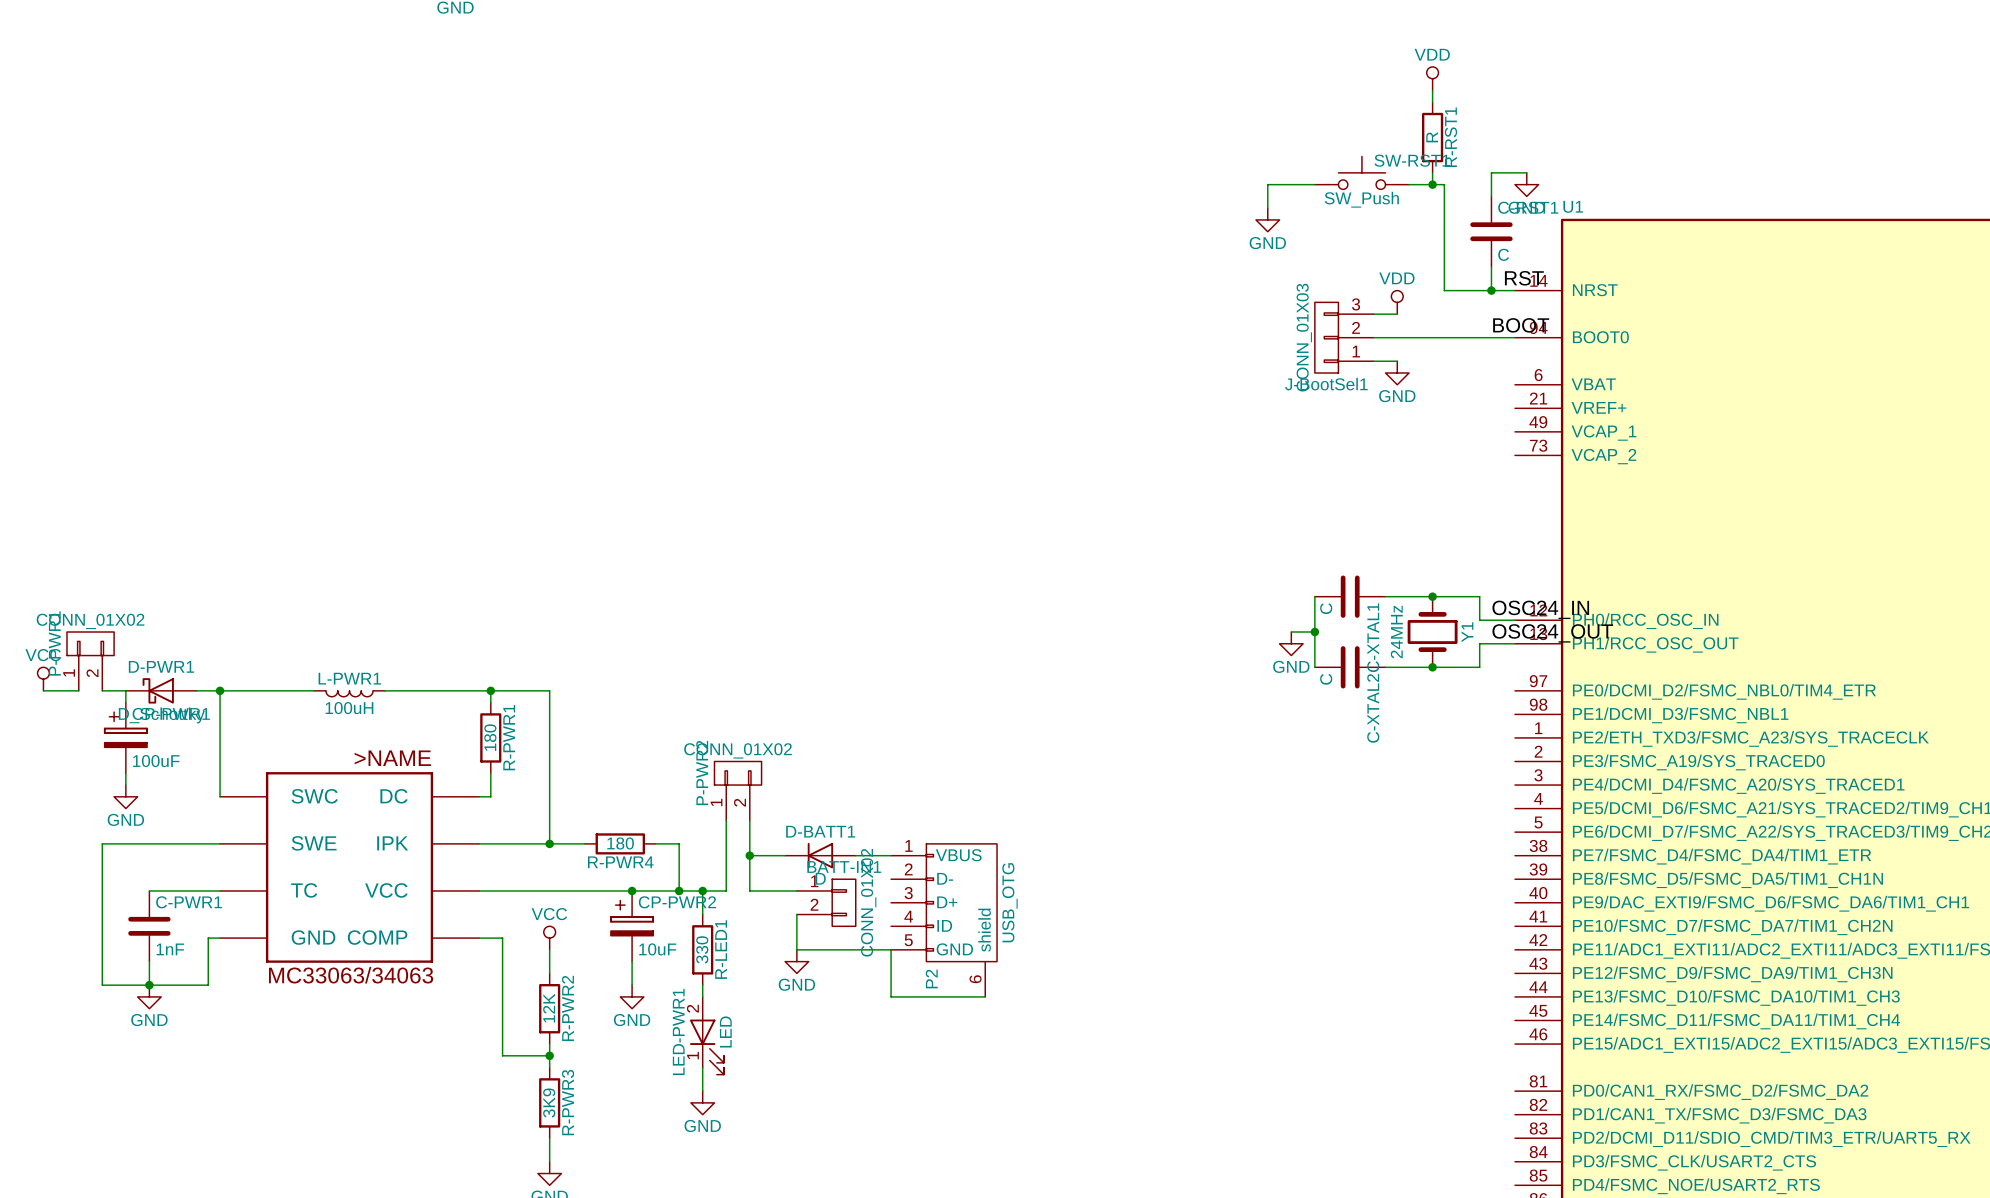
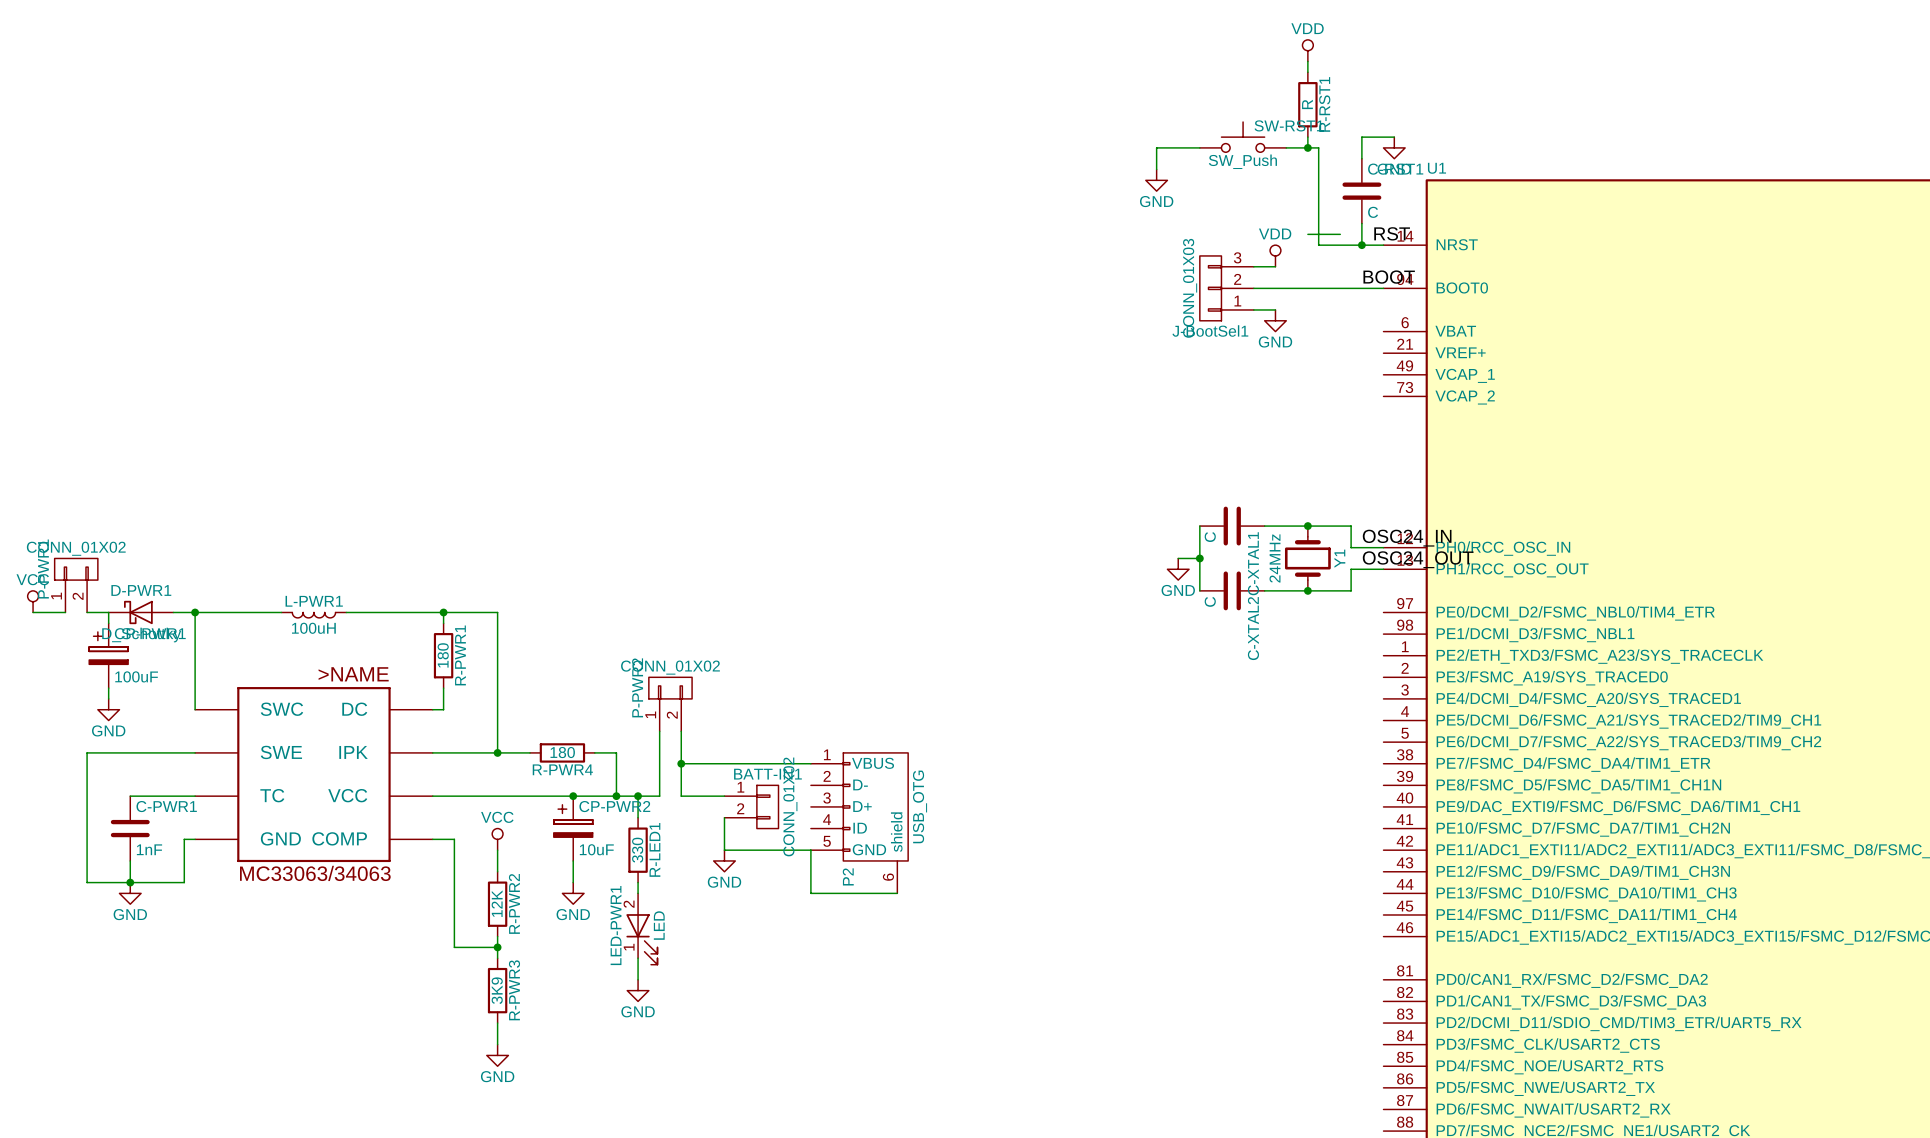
wire: none -> (1307, 234) (1340, 234)
D-BATT1: D (820, 855) -> none

